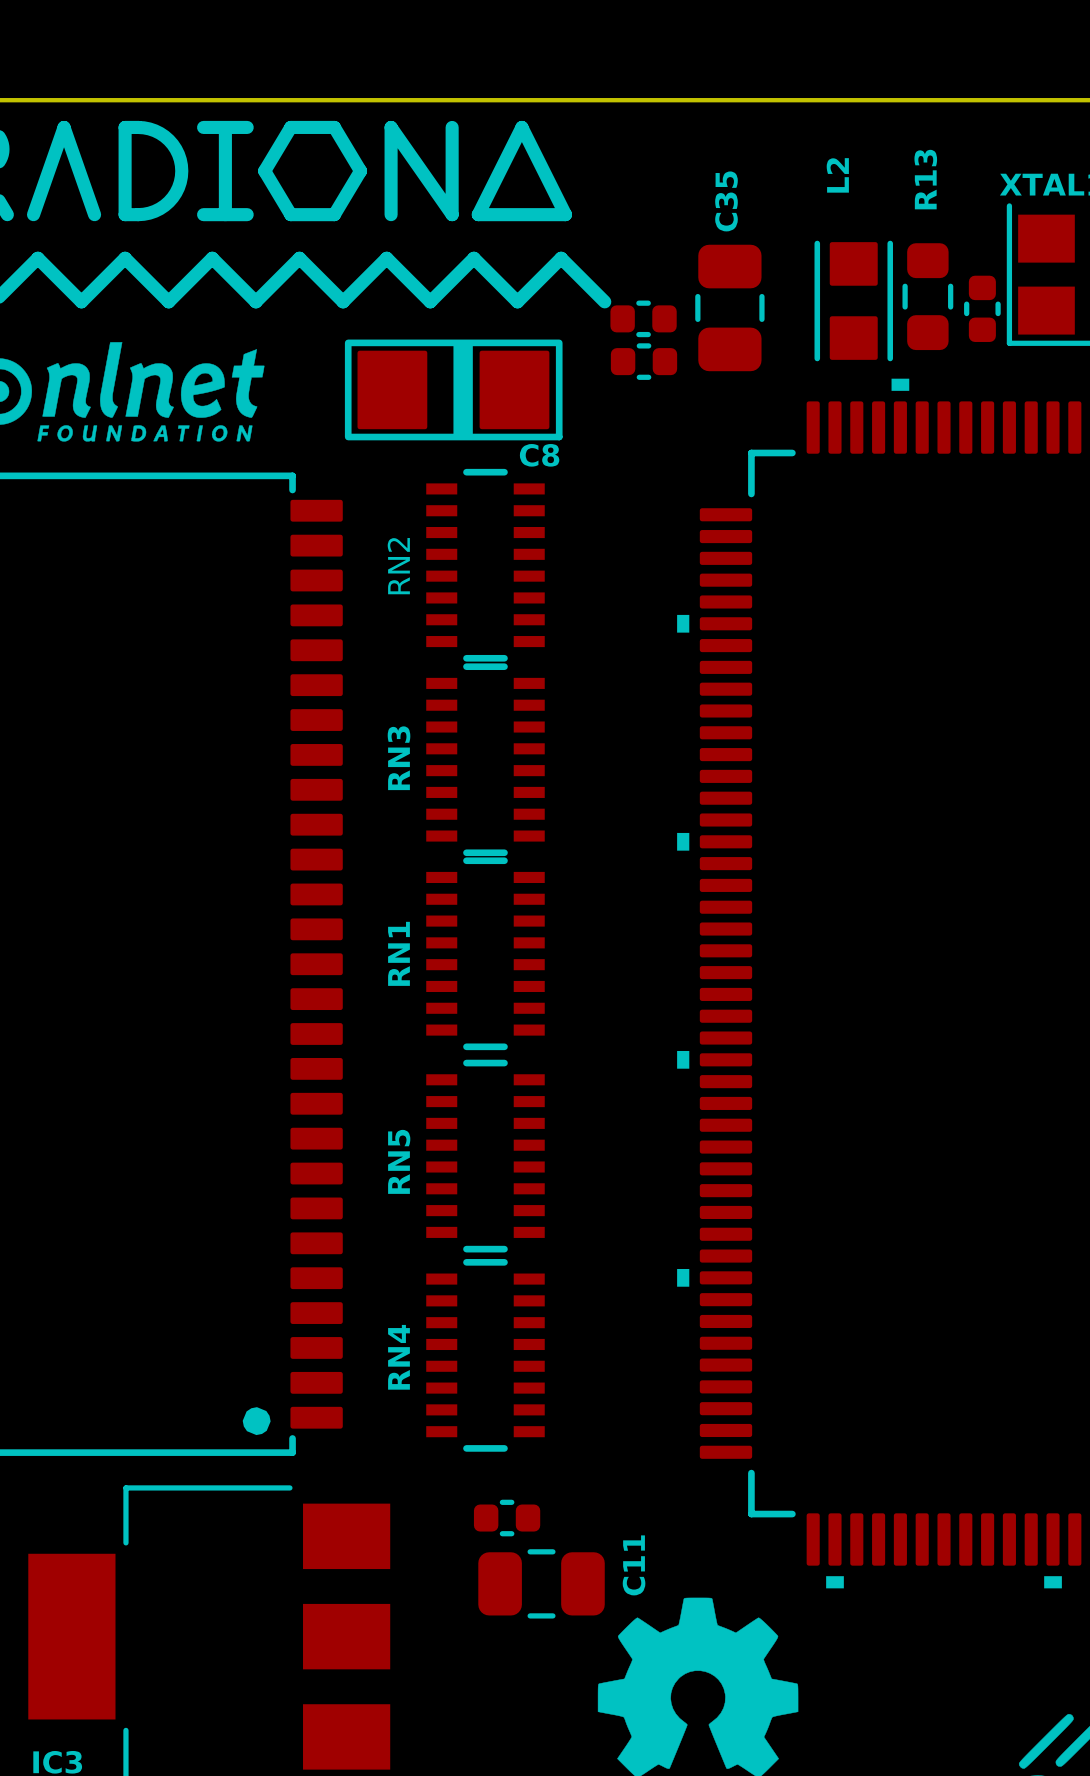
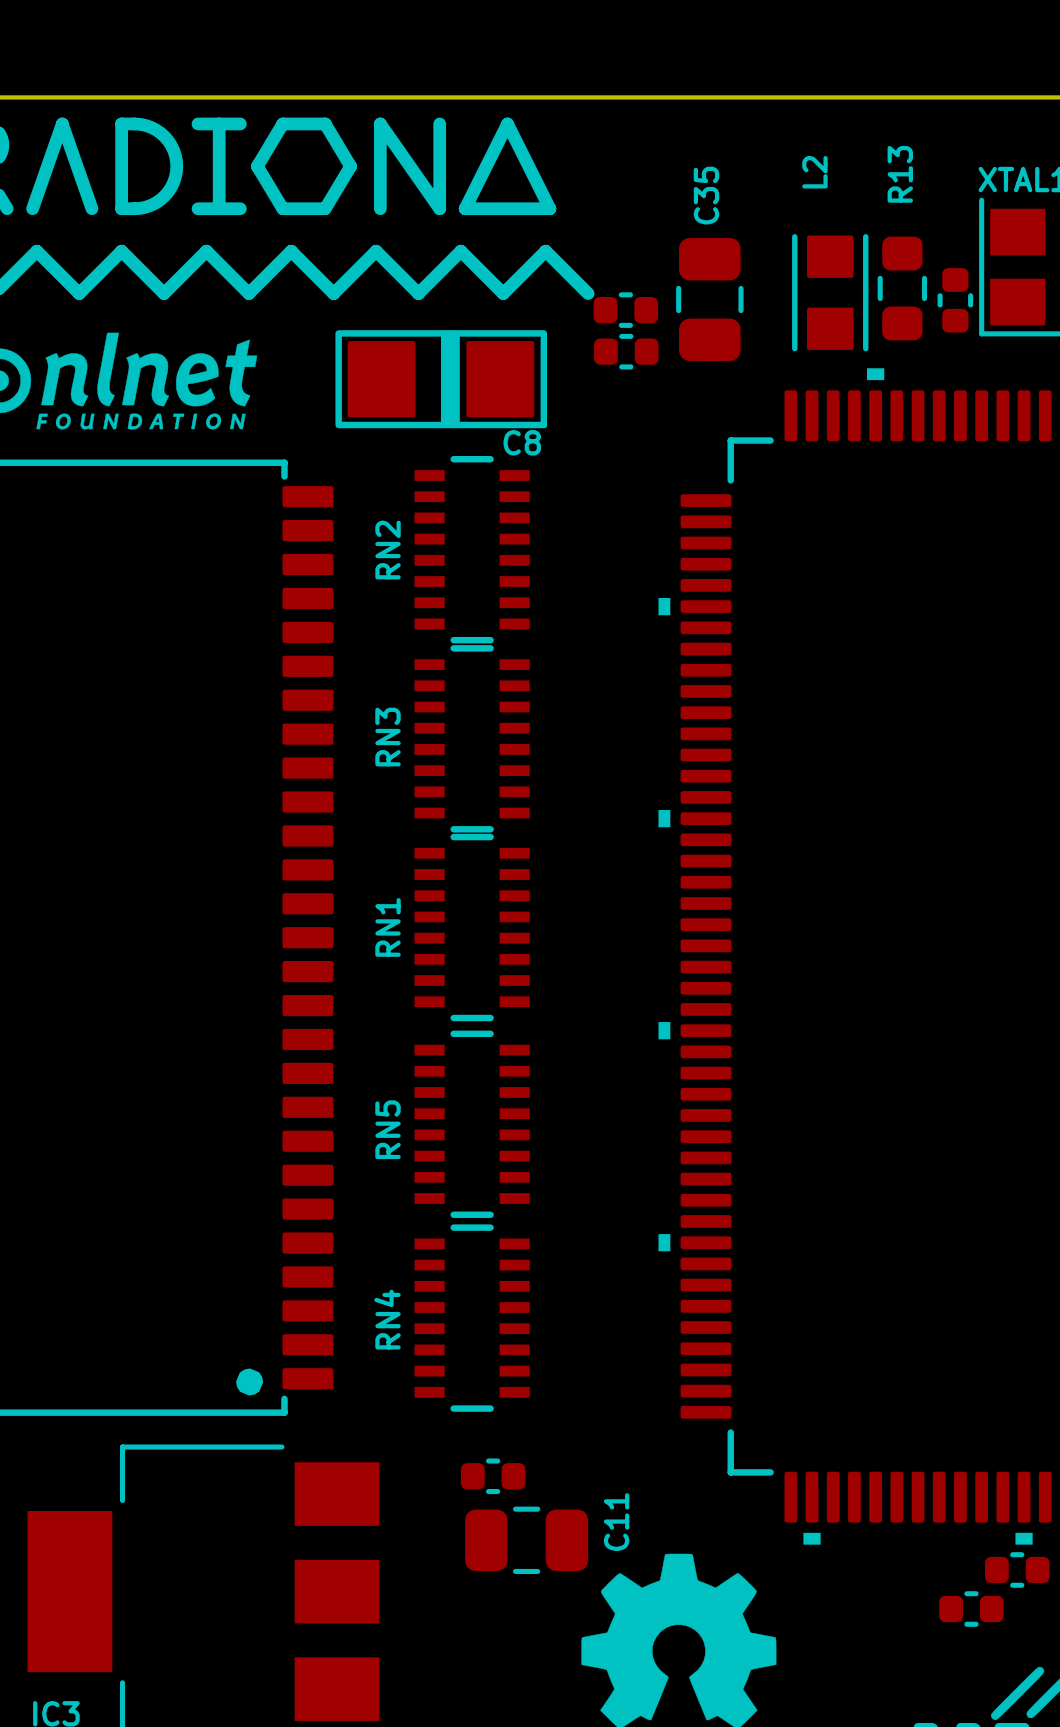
part: none -> (1017, 1569)
part: none -> (971, 1609)

